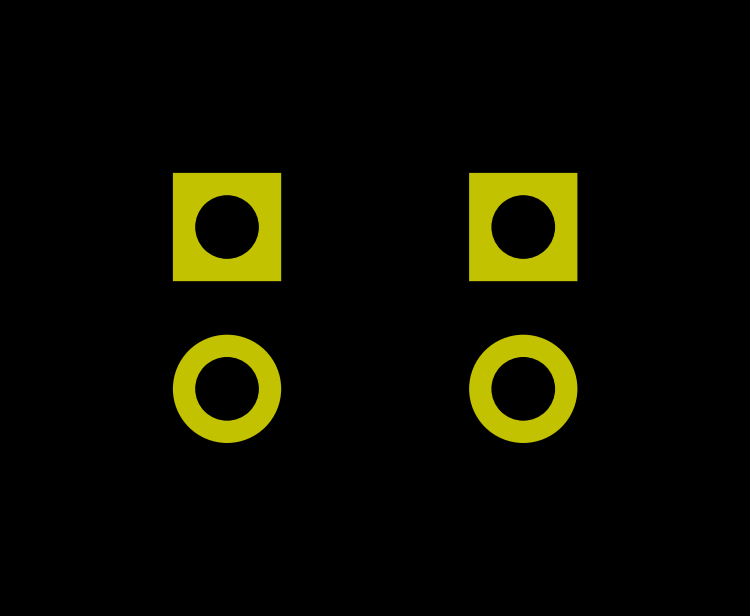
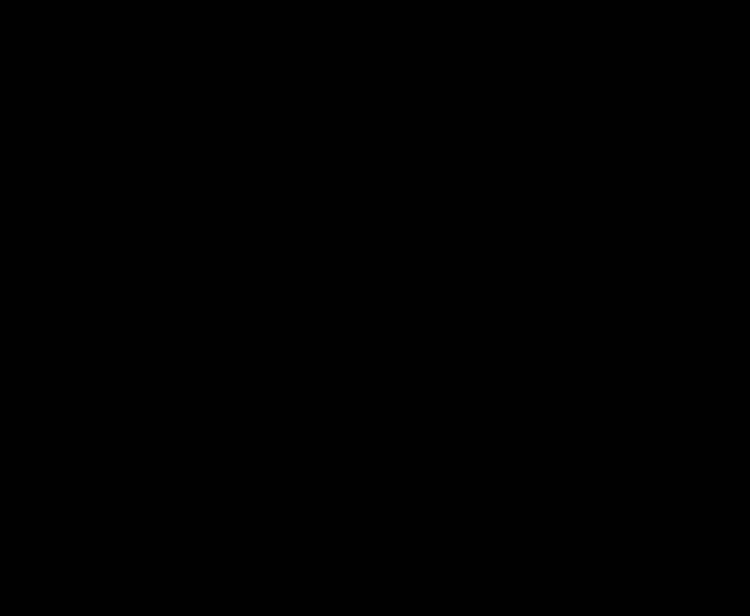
part: (227, 307) -> none
part: (523, 307) -> none

